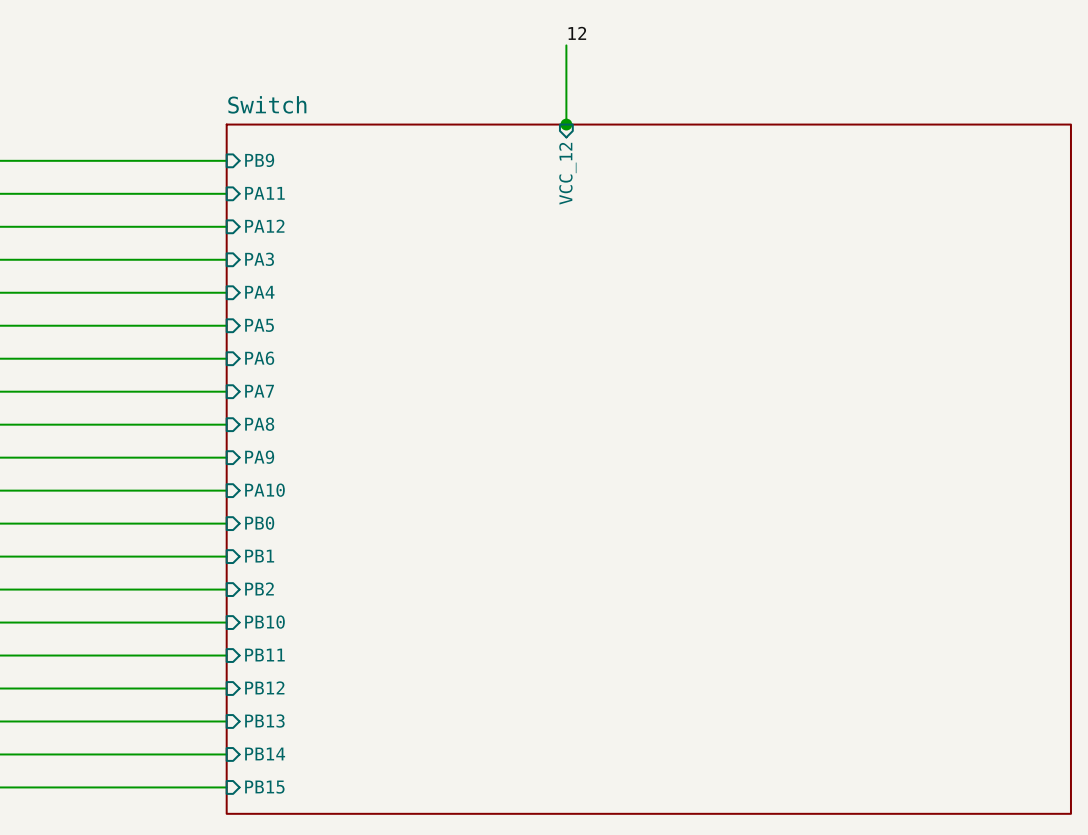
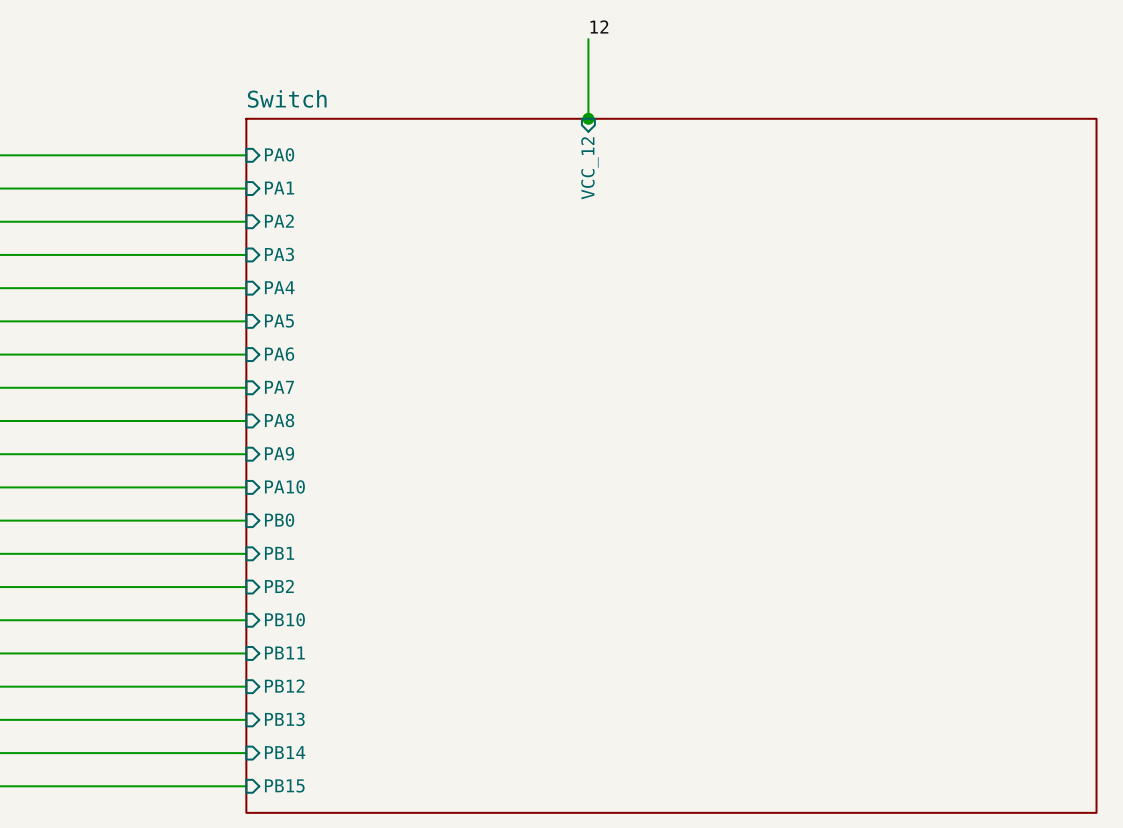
sheet pin: PB9 (259, 160) -> PA0 (279, 154)
sheet pin: PA11 (264, 193) -> PA1 (279, 188)
sheet pin: PA12 (264, 226) -> PA2 (279, 221)

